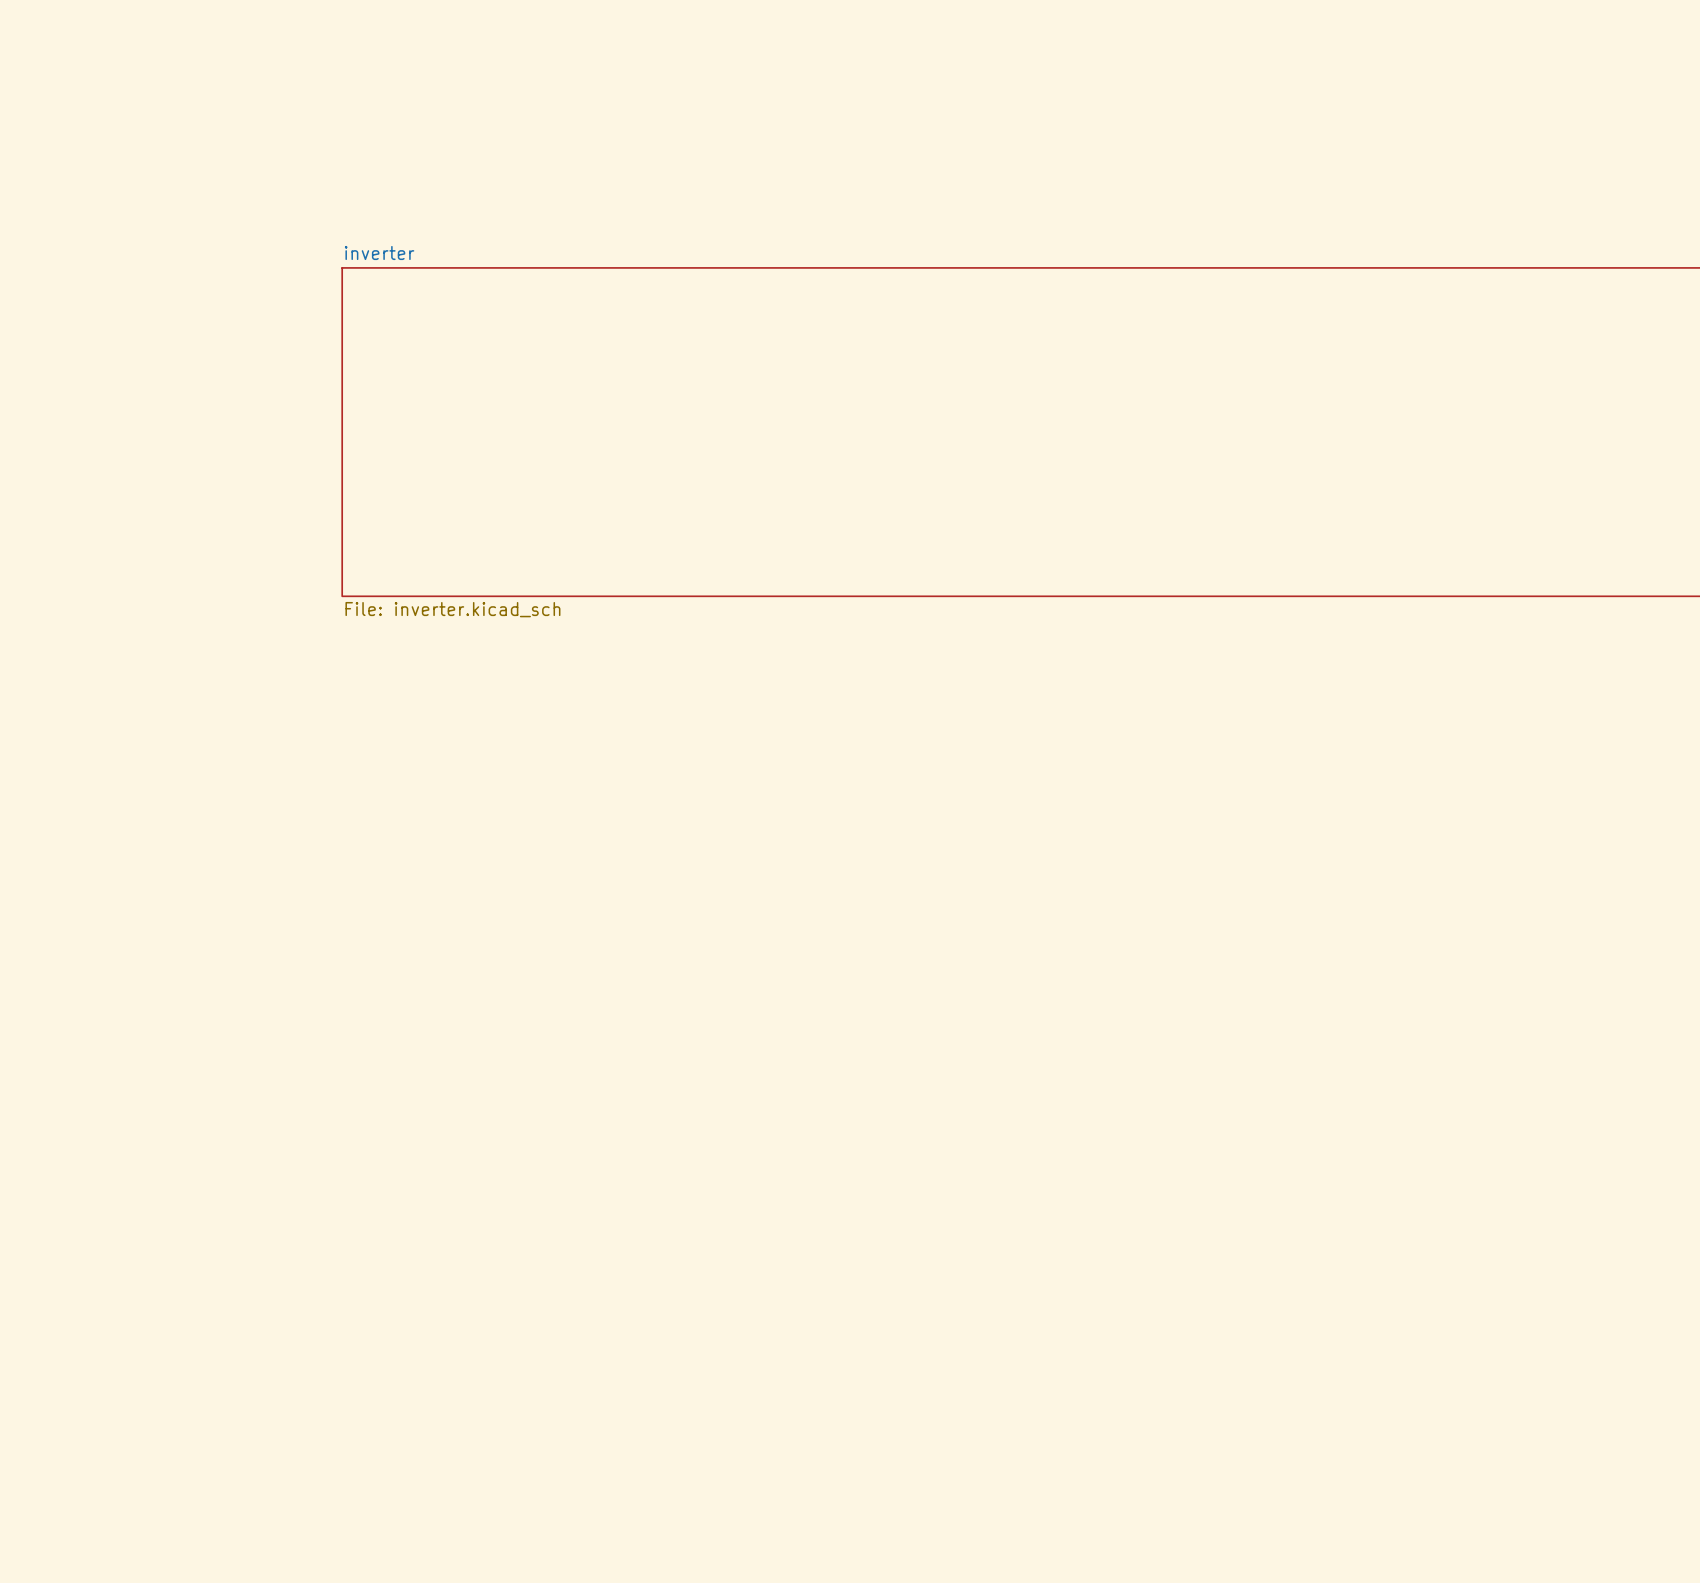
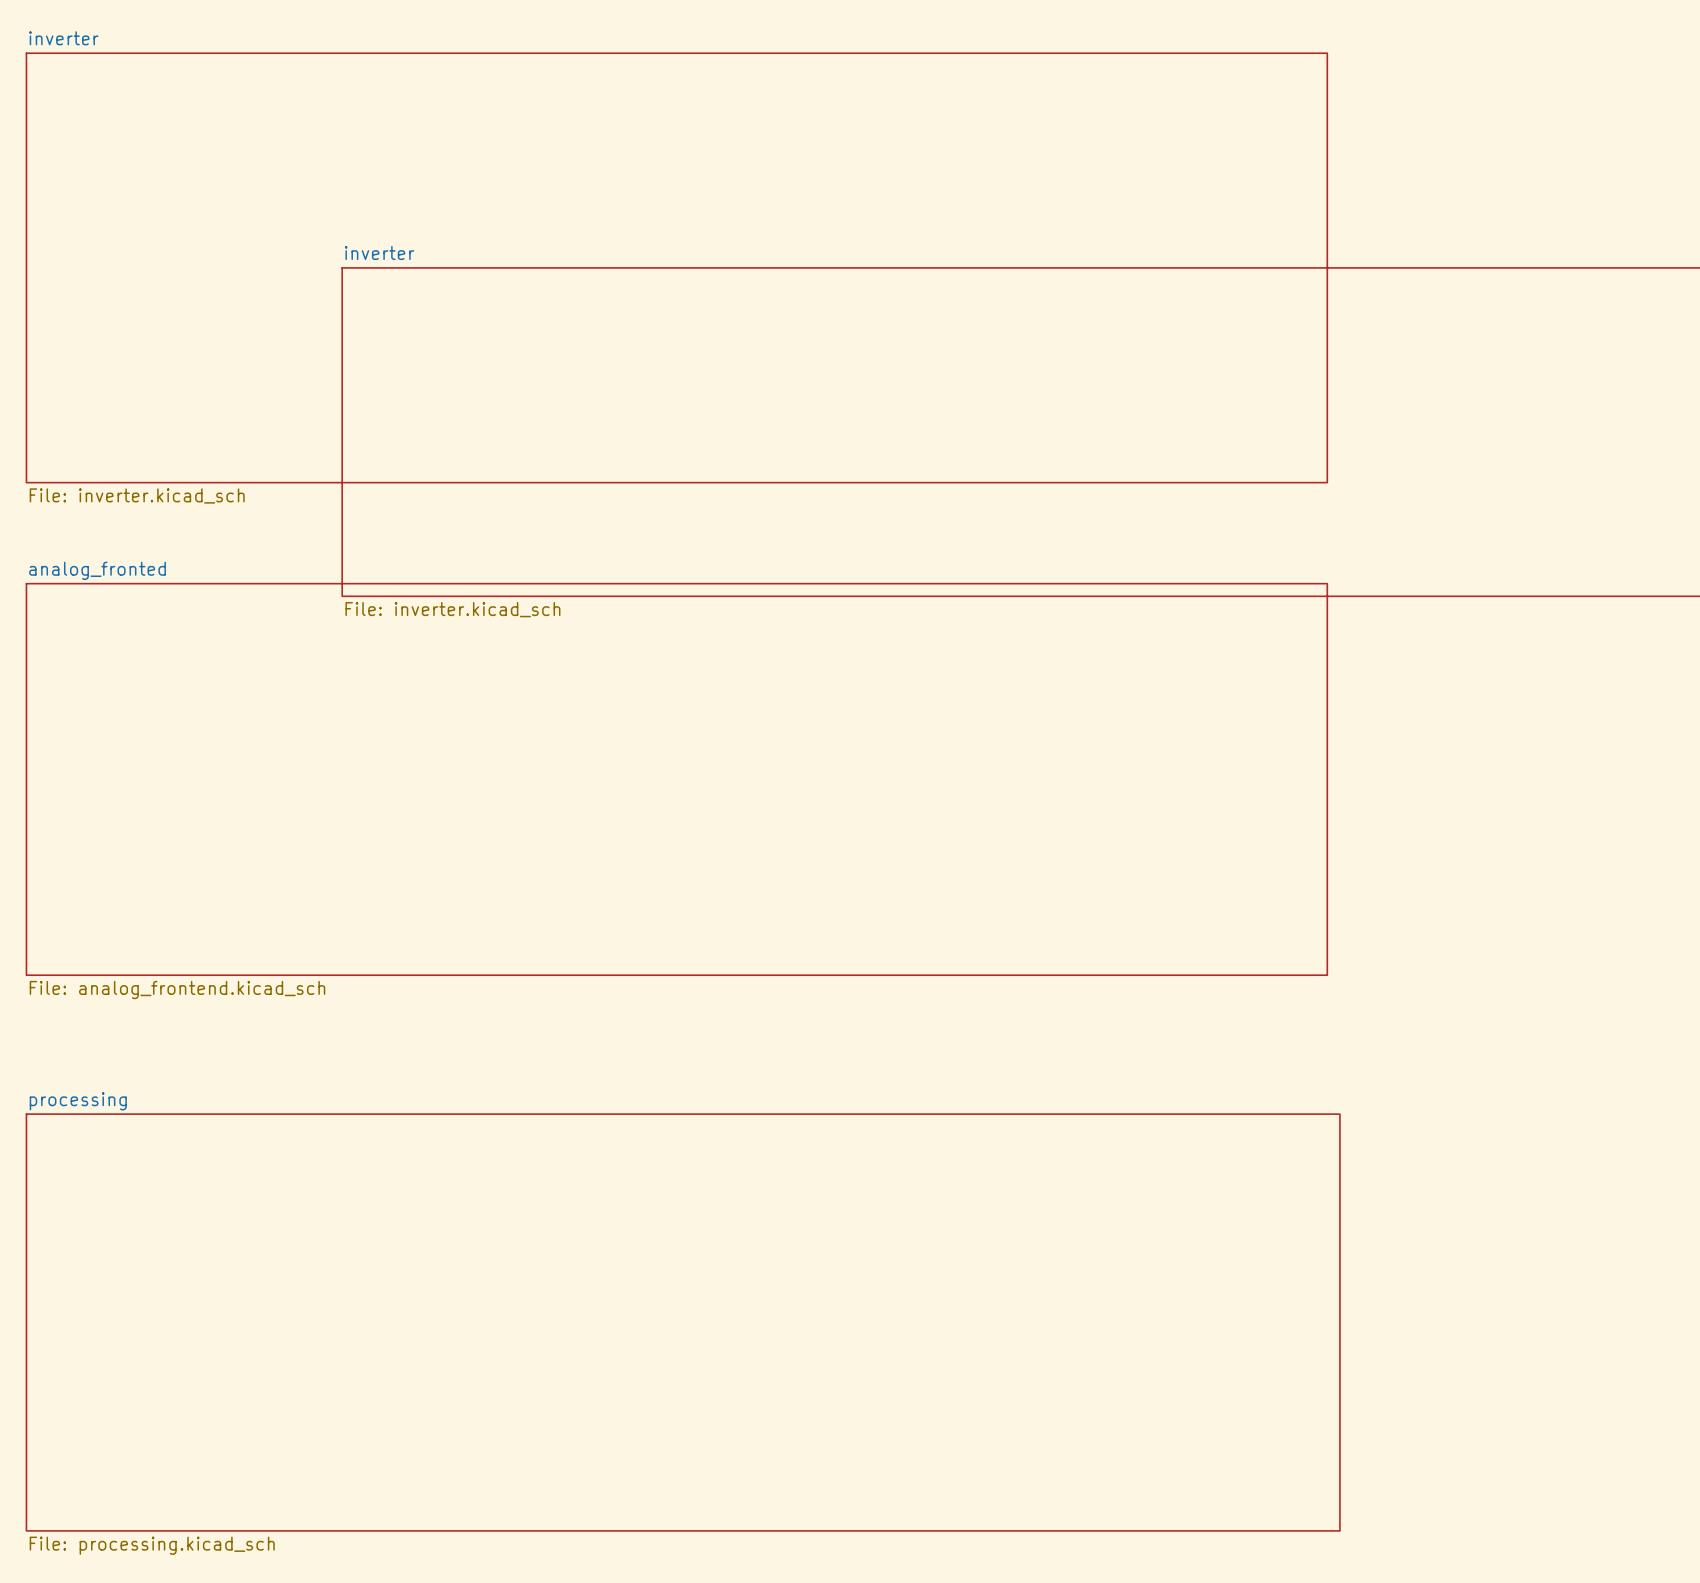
sheet inverter: none -> File: inverter.kicad_sch (676, 267)
sheet analog_fronted: none -> File: analog_frontend.kicad_sch (676, 779)
sheet processing: none -> File: processing.kicad_sch (683, 1322)

